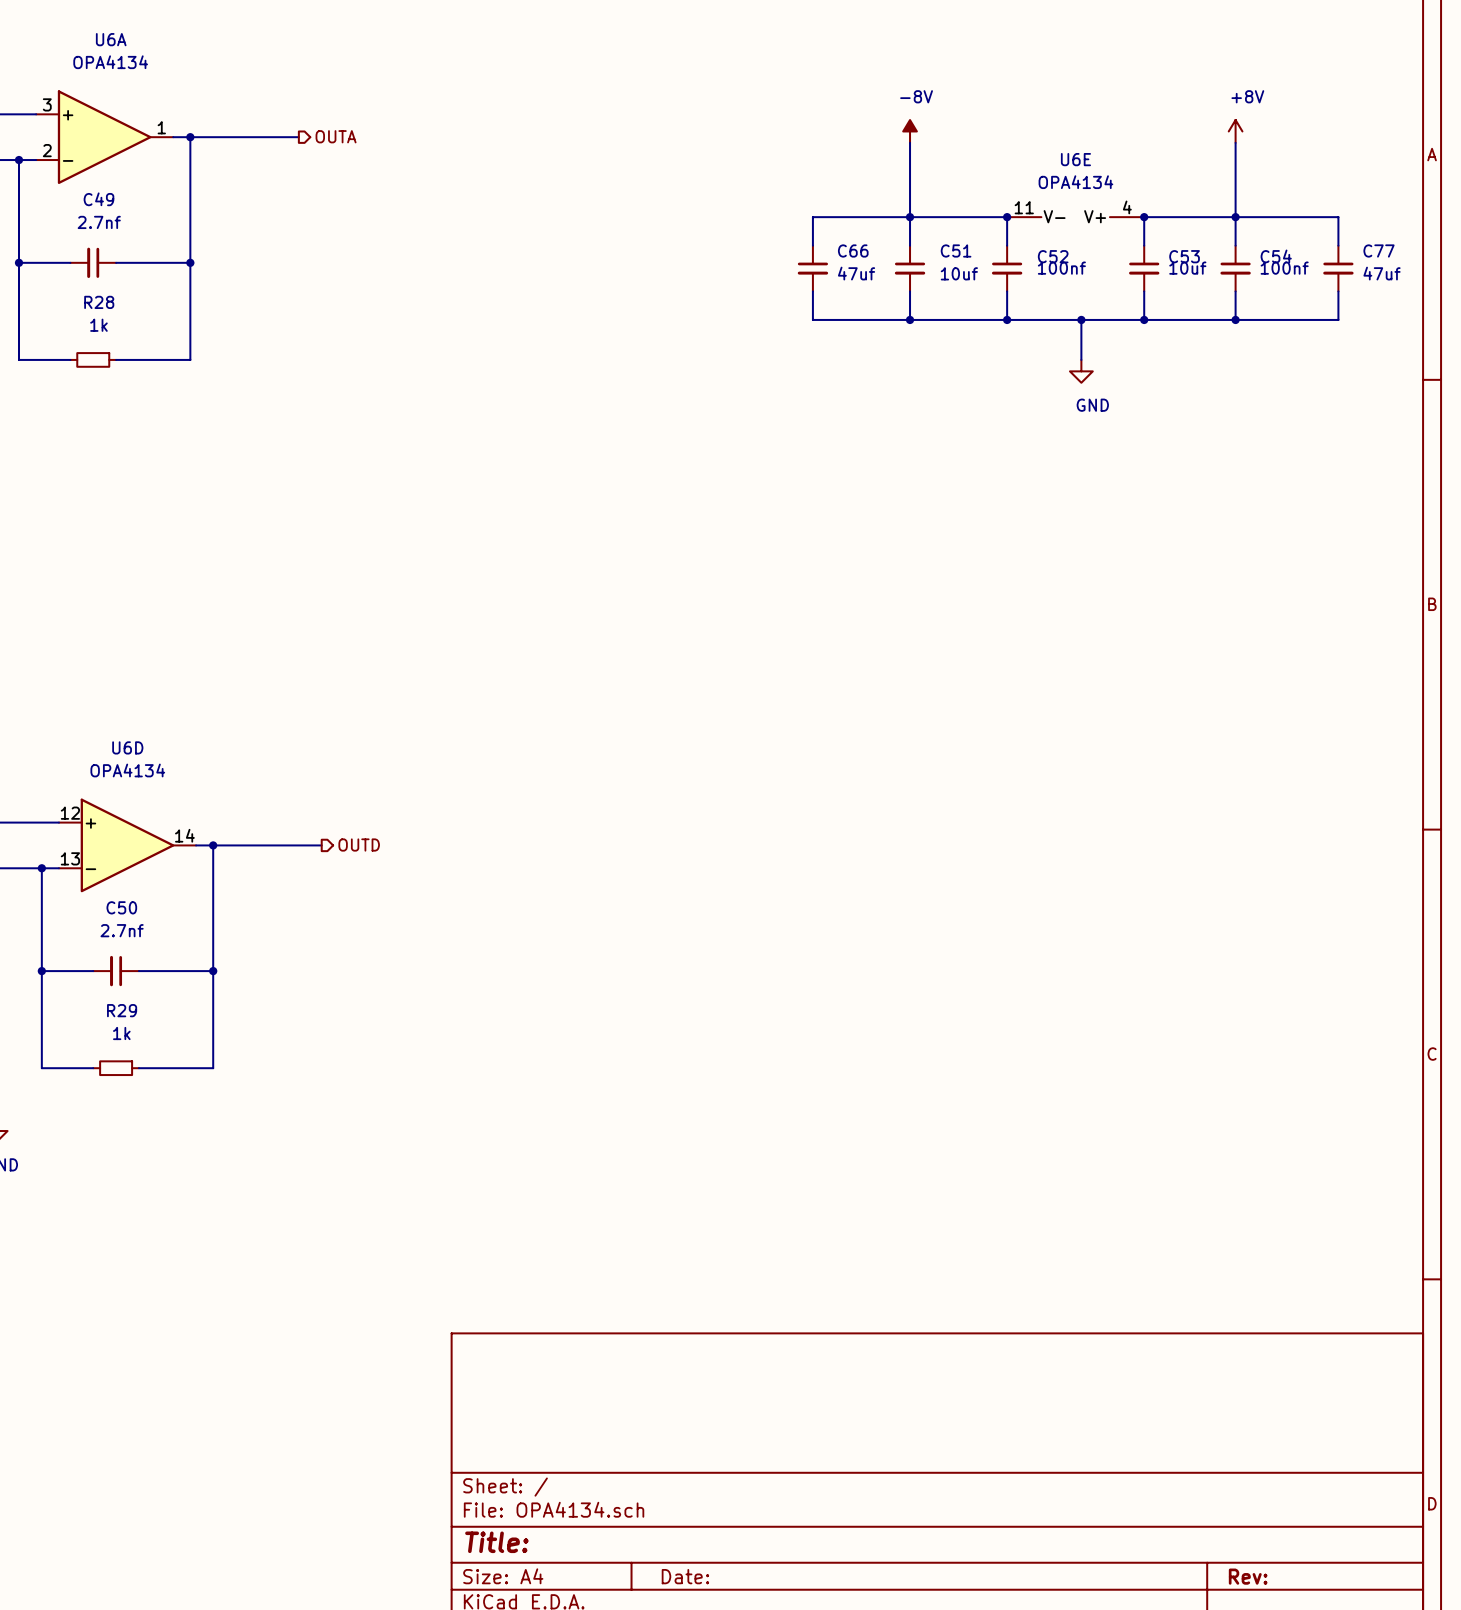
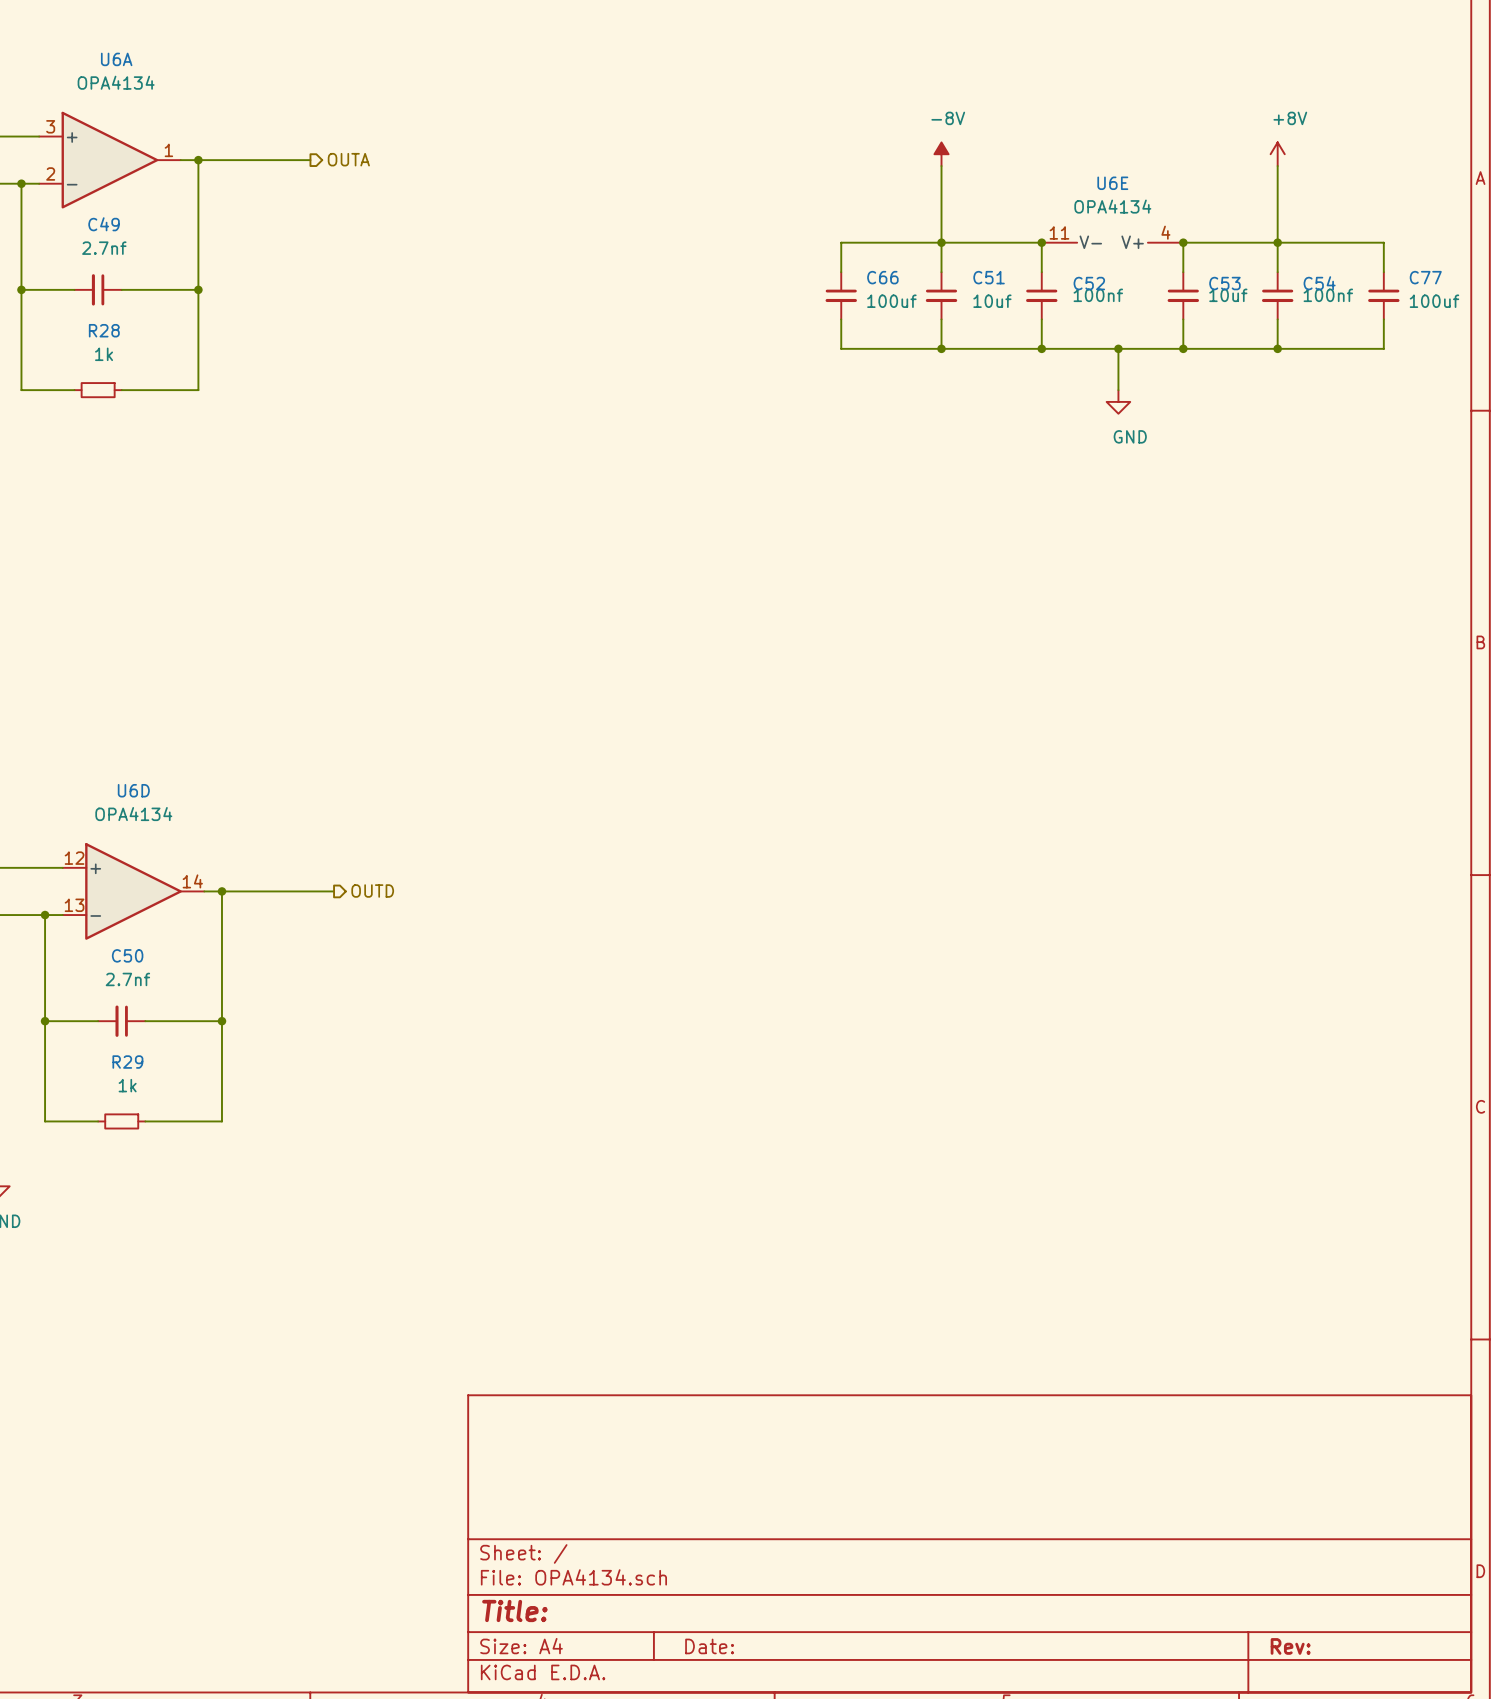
C66 value: 47uf (856, 273) -> 100uf (891, 301)
C77 value: 47uf (1382, 273) -> 100uf (1434, 301)

